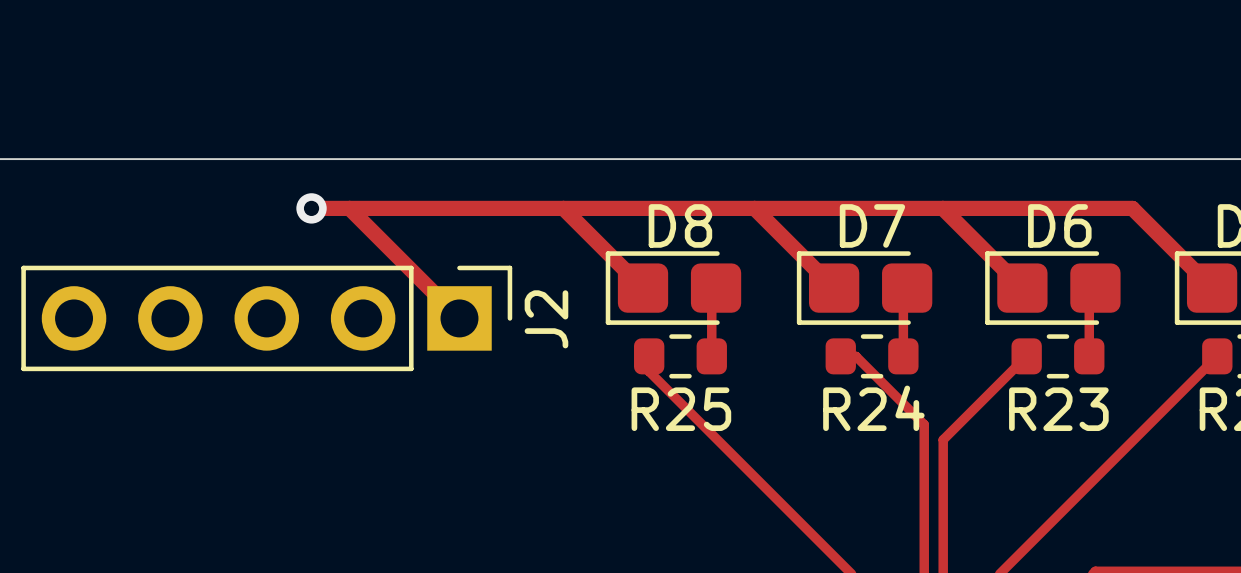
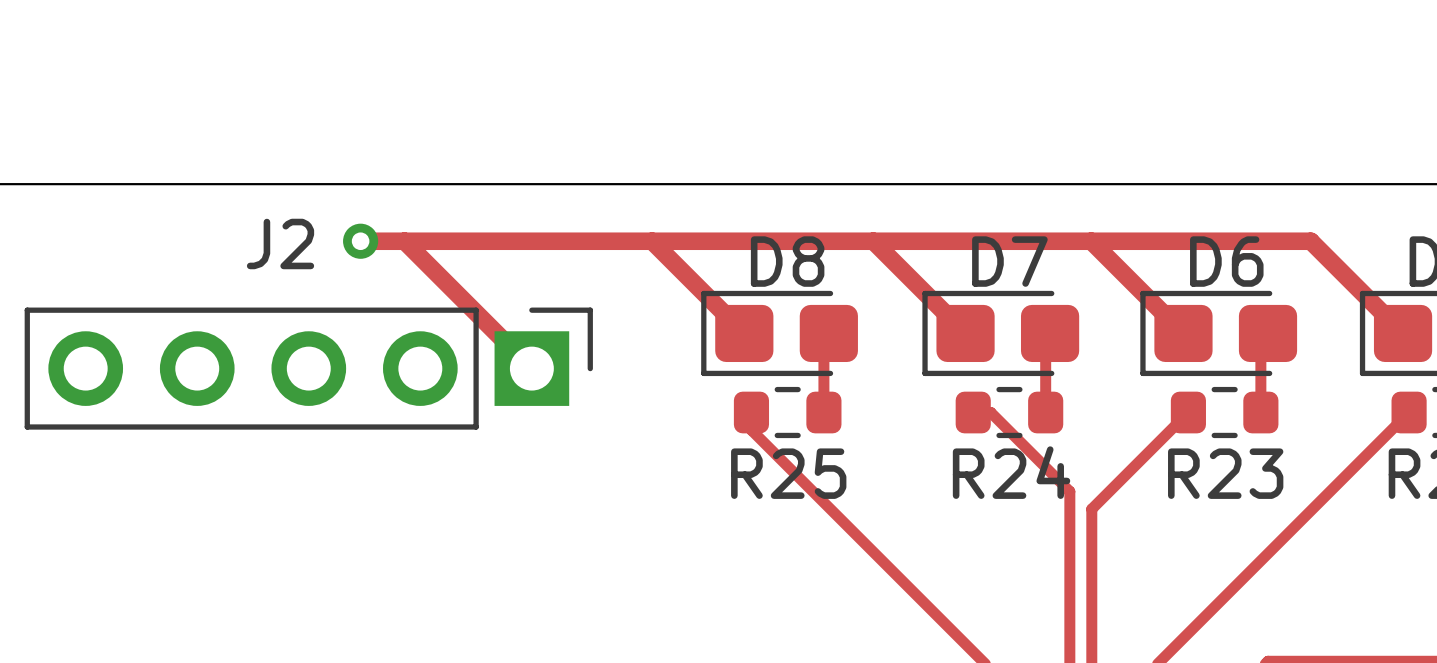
J2 name rotation: 0° (546, 319) -> 90° clockwise (280, 243)
J2 name position: J2 (546, 319) -> J2 (280, 243)

